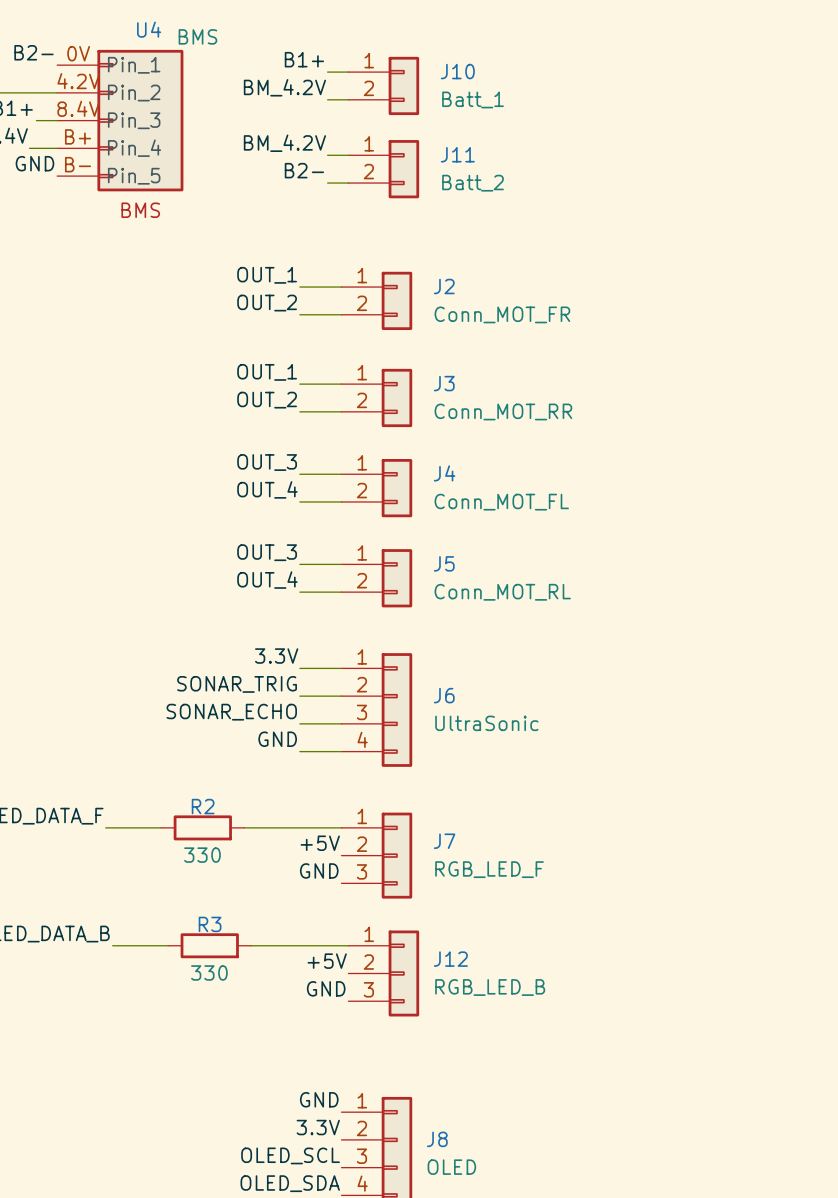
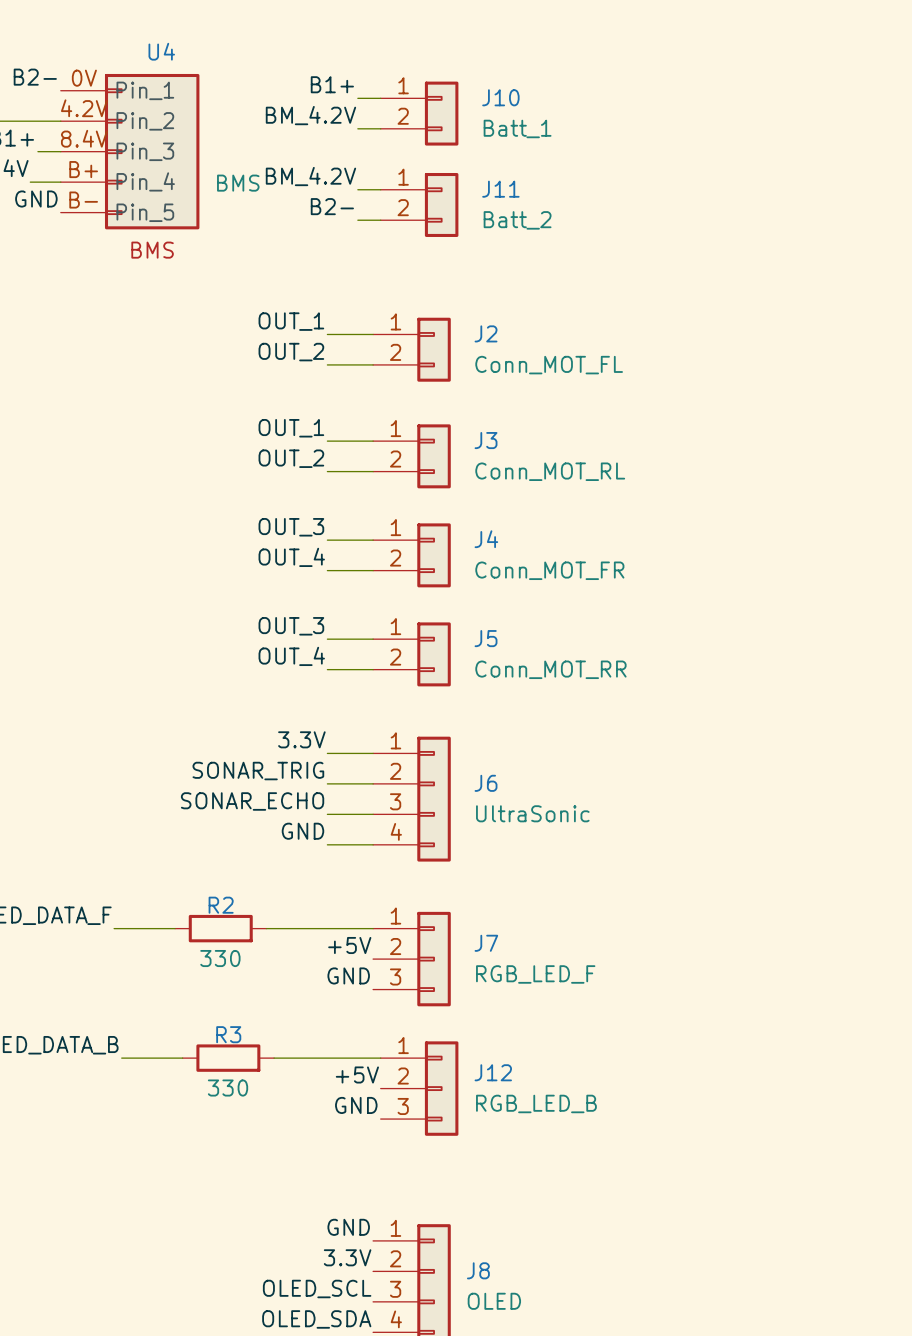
U4 value position: BMS (197, 36) -> BMS (238, 183)
J2 value: Conn_MOT_FR (502, 314) -> Conn_MOT_FL (549, 365)
J3 value: Conn_MOT_RR (503, 411) -> Conn_MOT_RL (550, 471)
J4 value: Conn_MOT_FL (501, 502) -> Conn_MOT_FR (549, 570)
J5 value: Conn_MOT_RL (502, 592) -> Conn_MOT_RR (550, 669)

